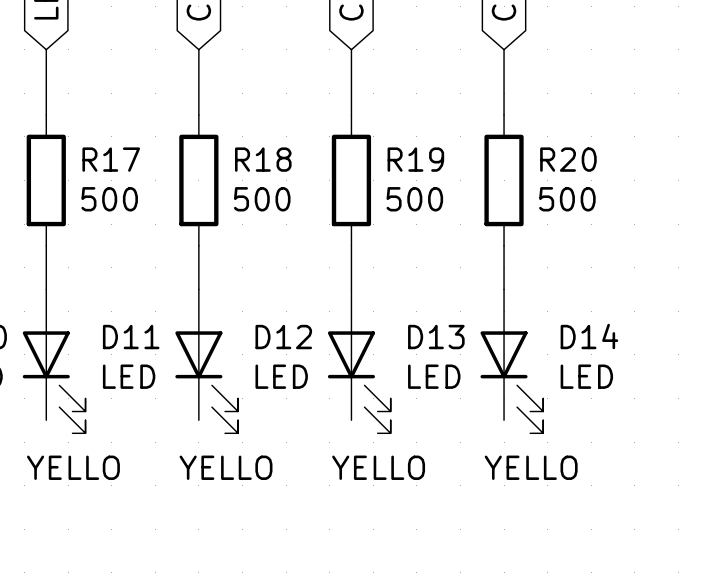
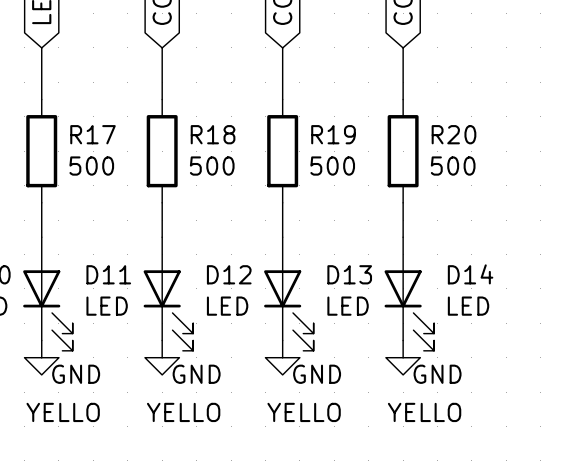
power symbol: none -> GND (41, 357)
power symbol: none -> GND (162, 357)
power symbol: none -> GND (282, 357)
power symbol: none -> GND (403, 357)
text position: YELLO (73, 467) -> YELLO (63, 412)
text position: YELLO (226, 467) -> YELLO (183, 412)
text position: YELLO (378, 467) -> YELLO (304, 412)
text position: YELLO (531, 467) -> YELLO (424, 412)

